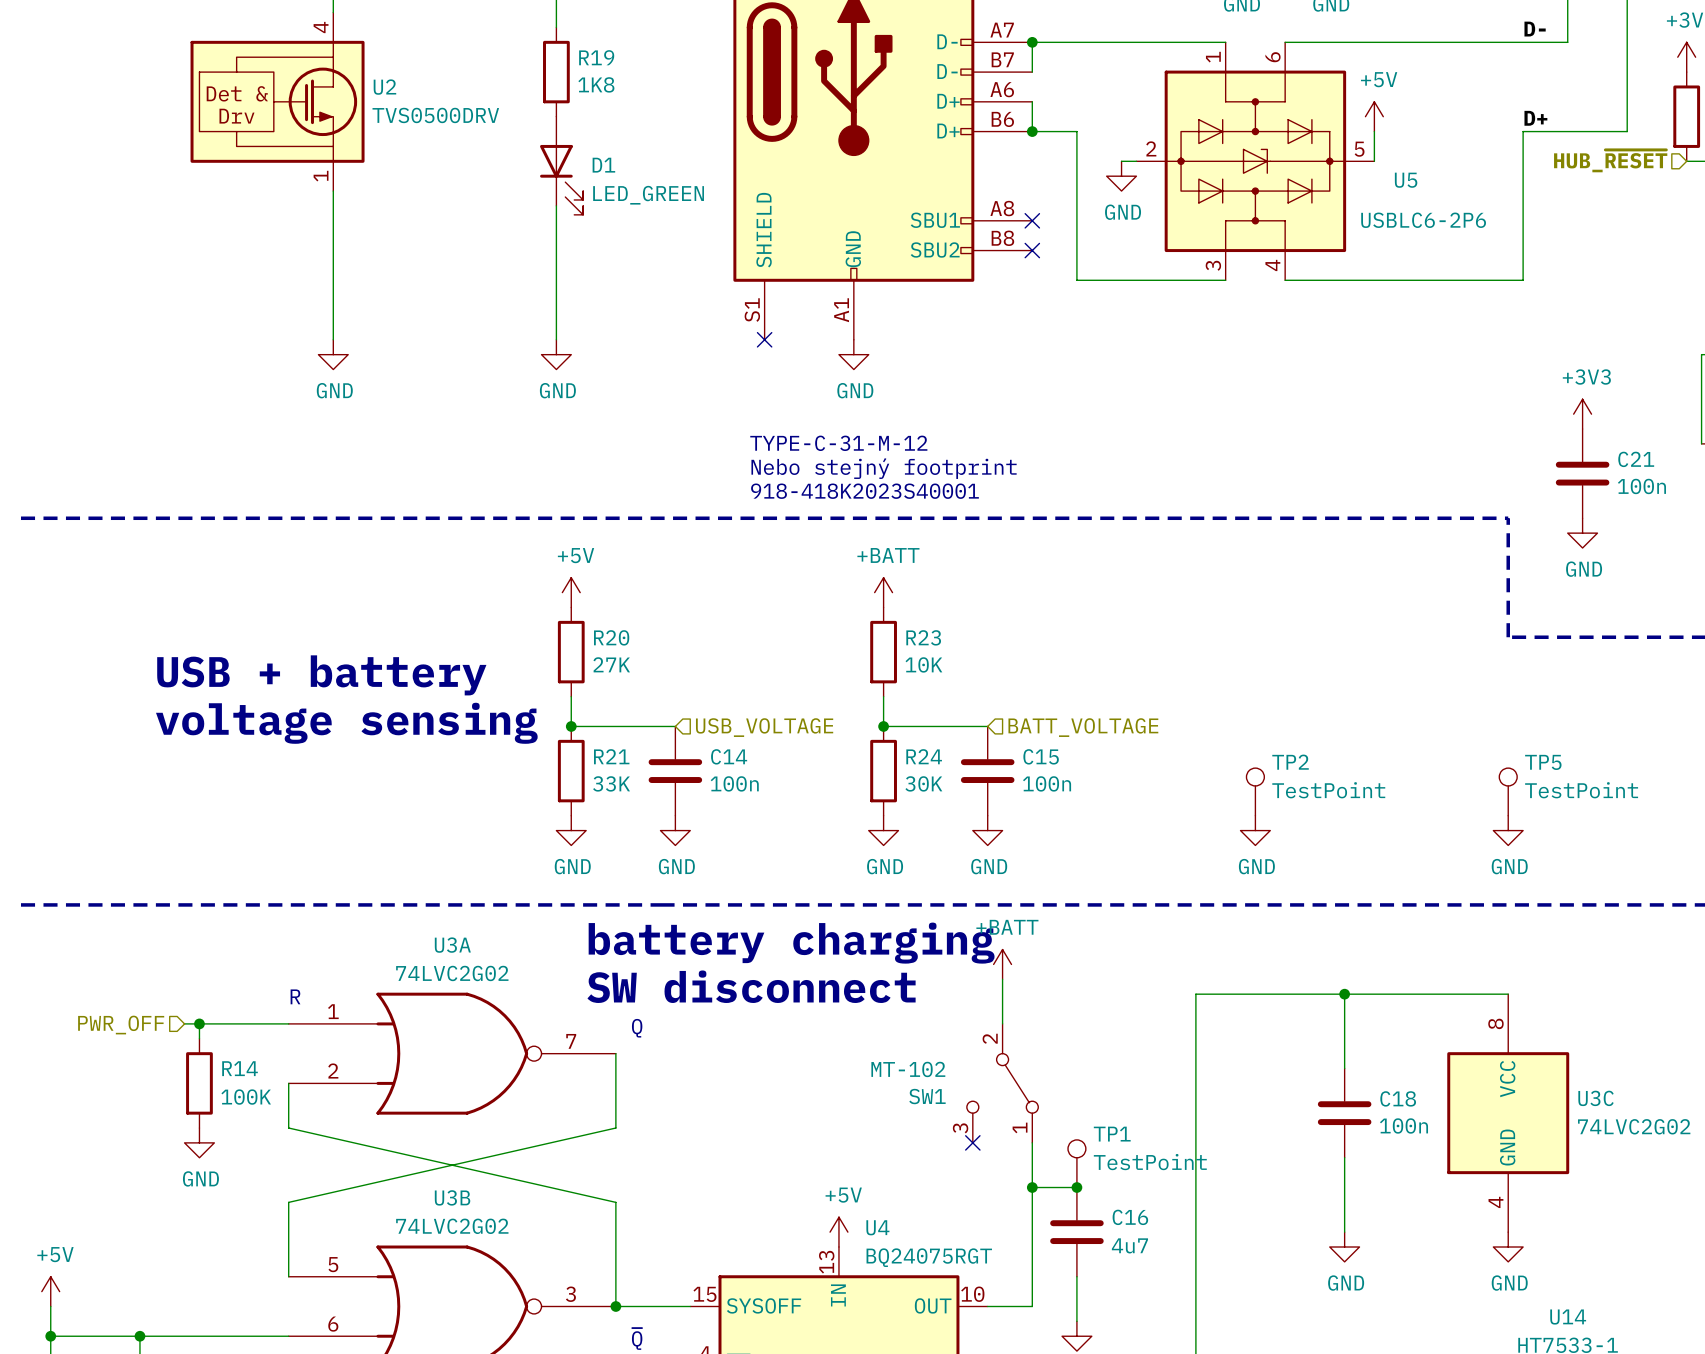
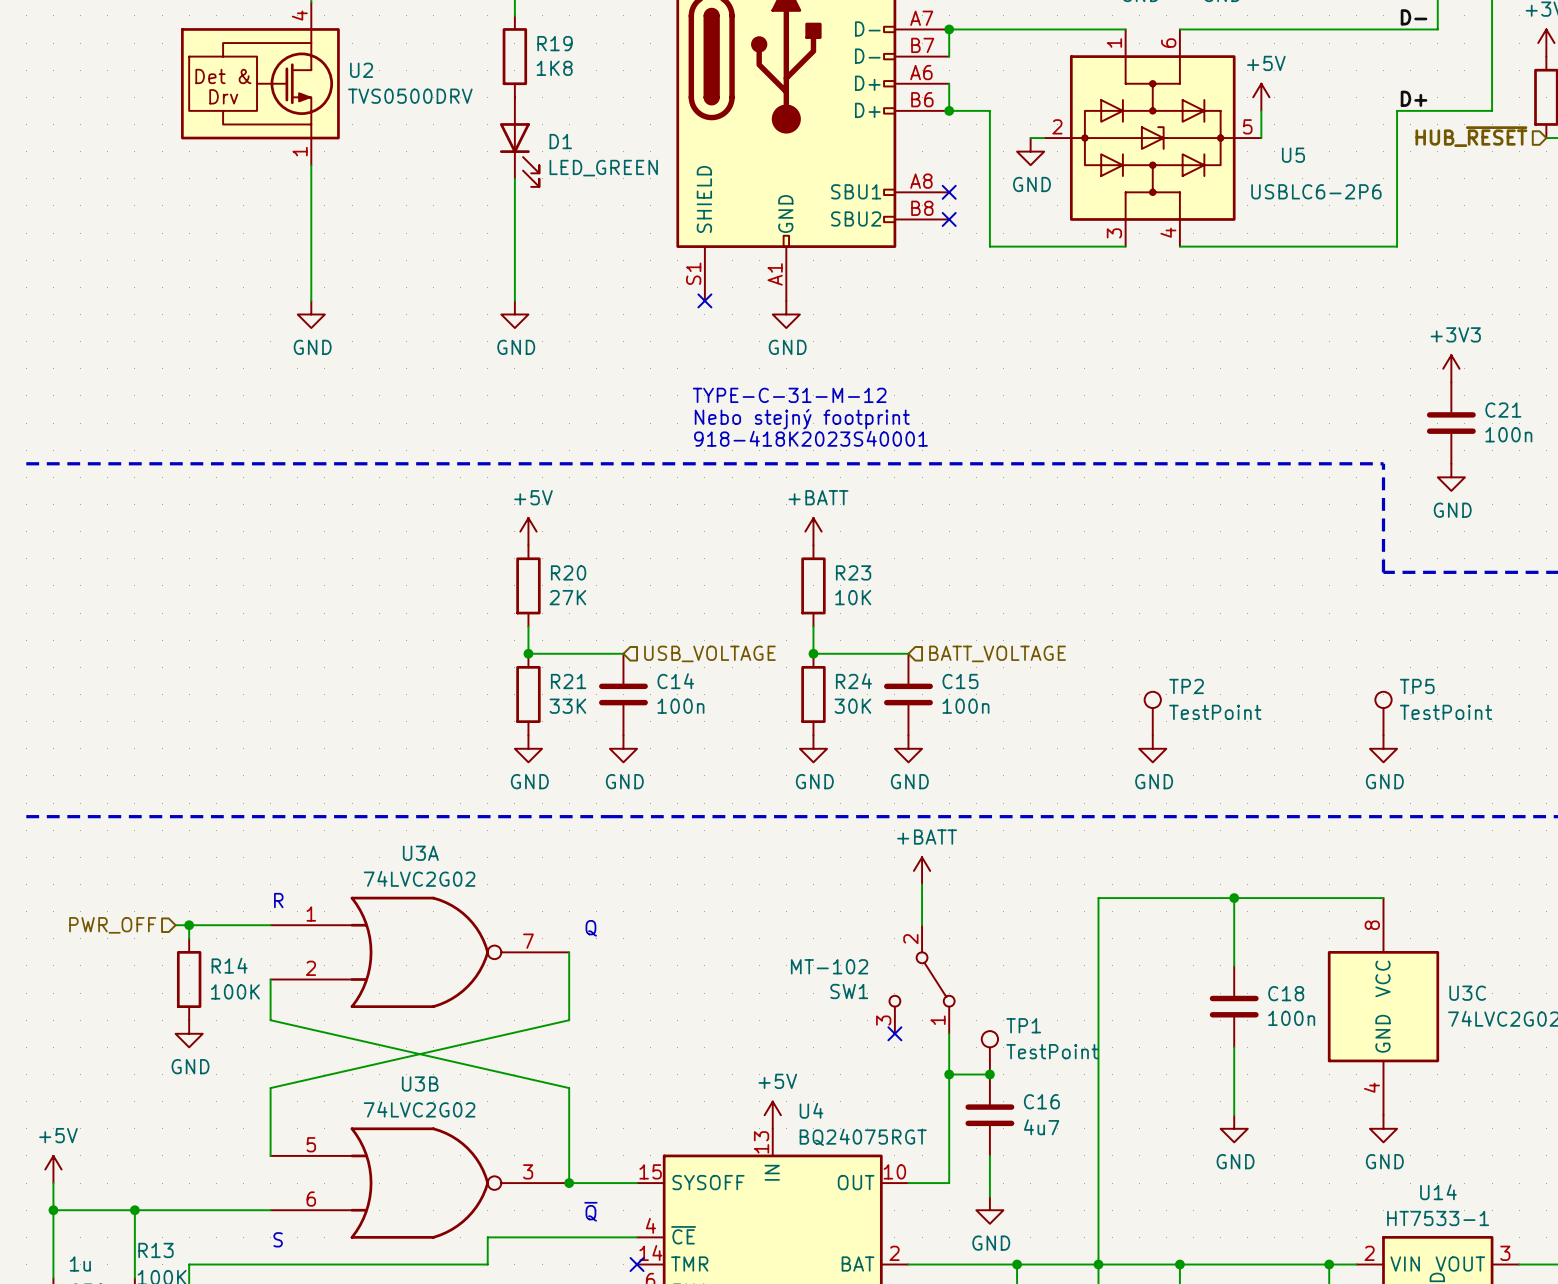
text: USB + battery (321, 675) -> none
text: voltage sensing (346, 723) -> none
text: battery charging (791, 943) -> none
text: SW disconnect (751, 986) -> none

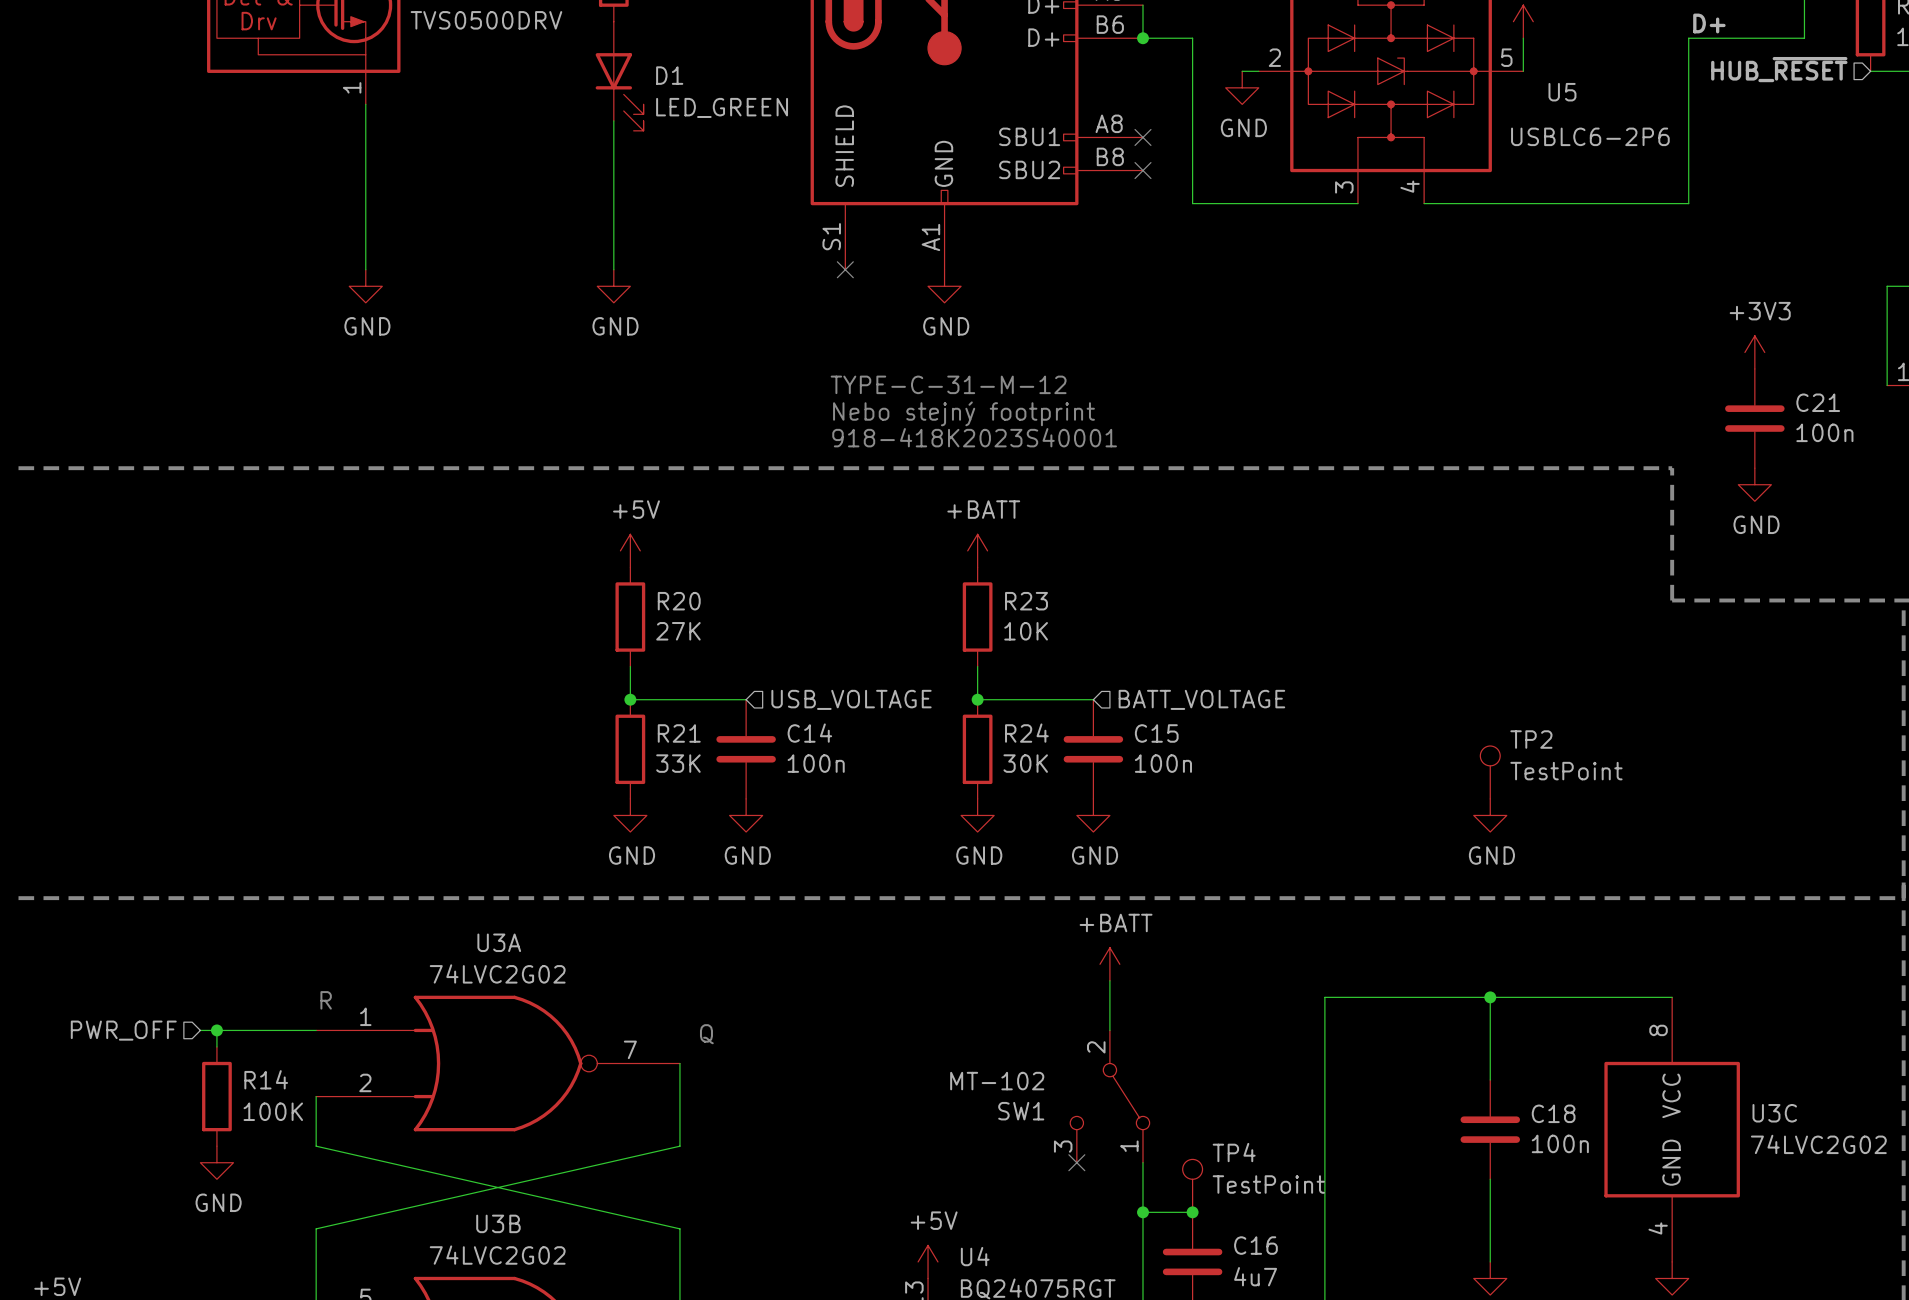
TP2 position: (1152, 713) -> (1490, 772)
TP5: TestPoint (1383, 713) -> none
power symbol: GND (1152, 748) -> none
power symbol: none -> GND (1490, 815)
power symbol: GND (1383, 748) -> none
TP1 name: TP1 (1023, 1025) -> TP4 (1234, 1152)

